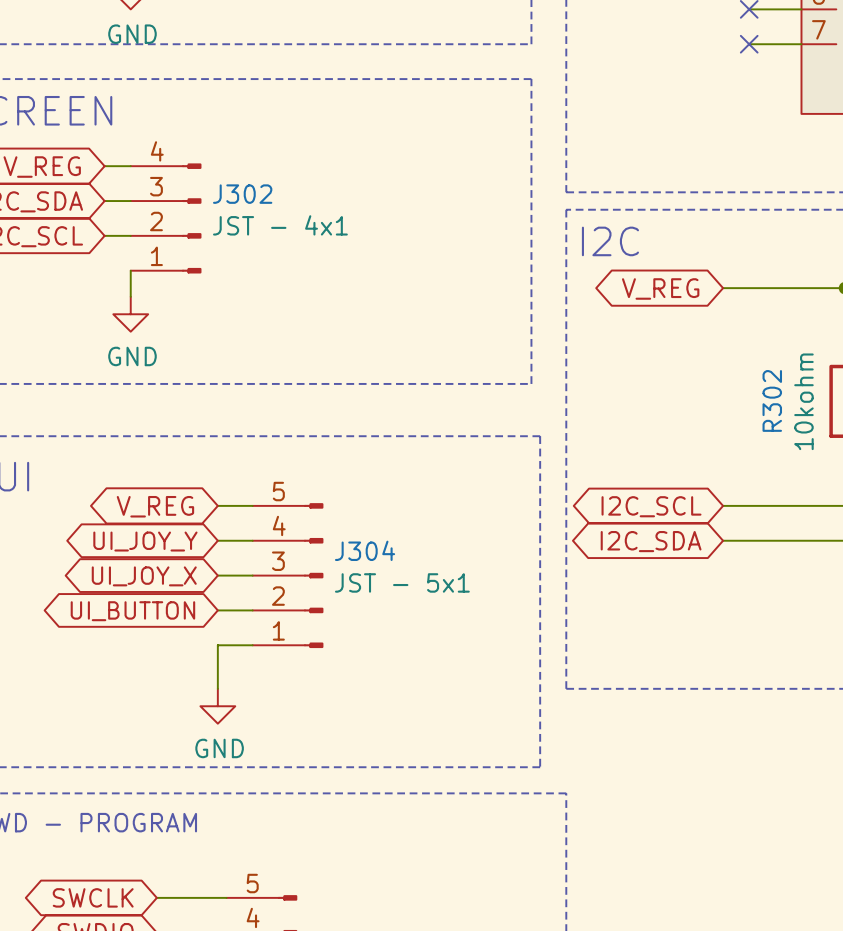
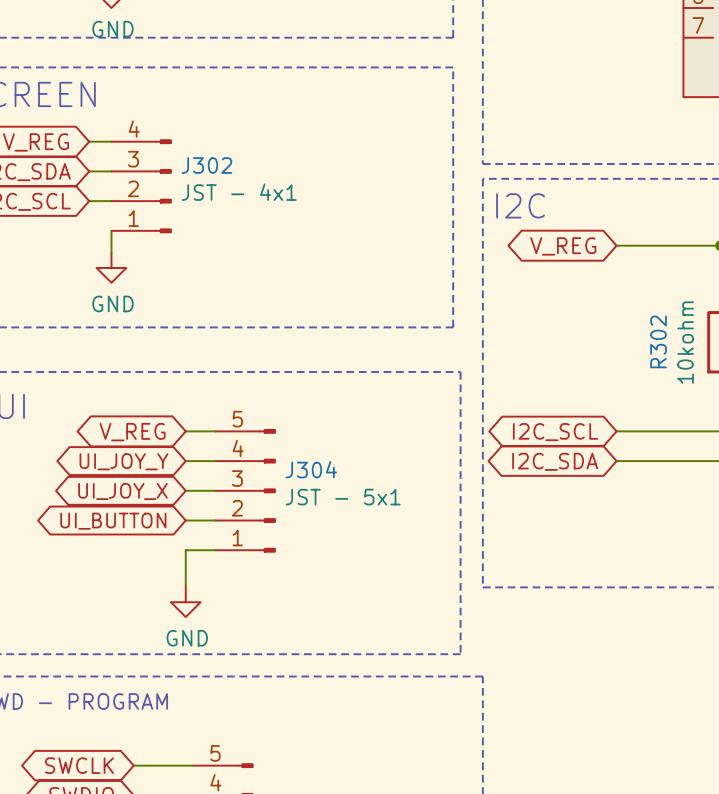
wire: (749, 9) (801, 9) -> none
no-connect mark: (749, 9) -> none
wire: (749, 44) (801, 44) -> none
no-connect mark: (749, 44) -> none

